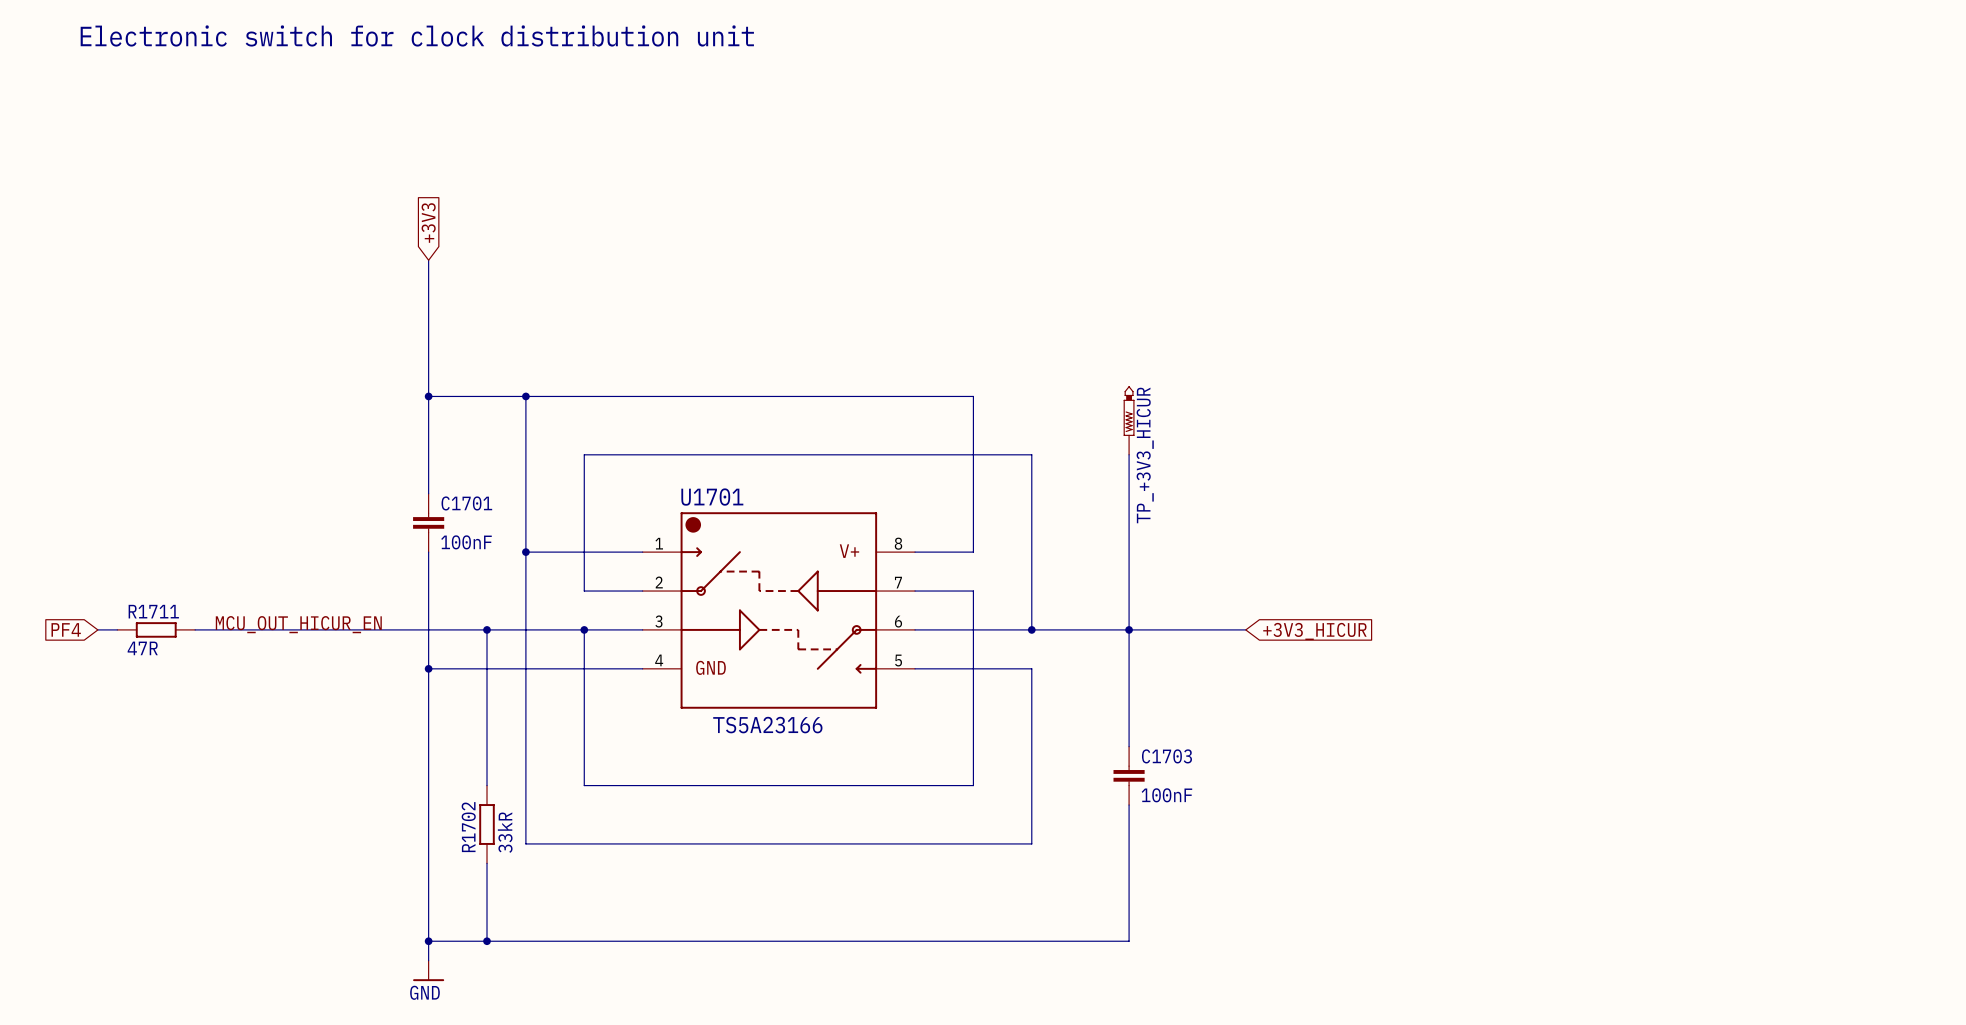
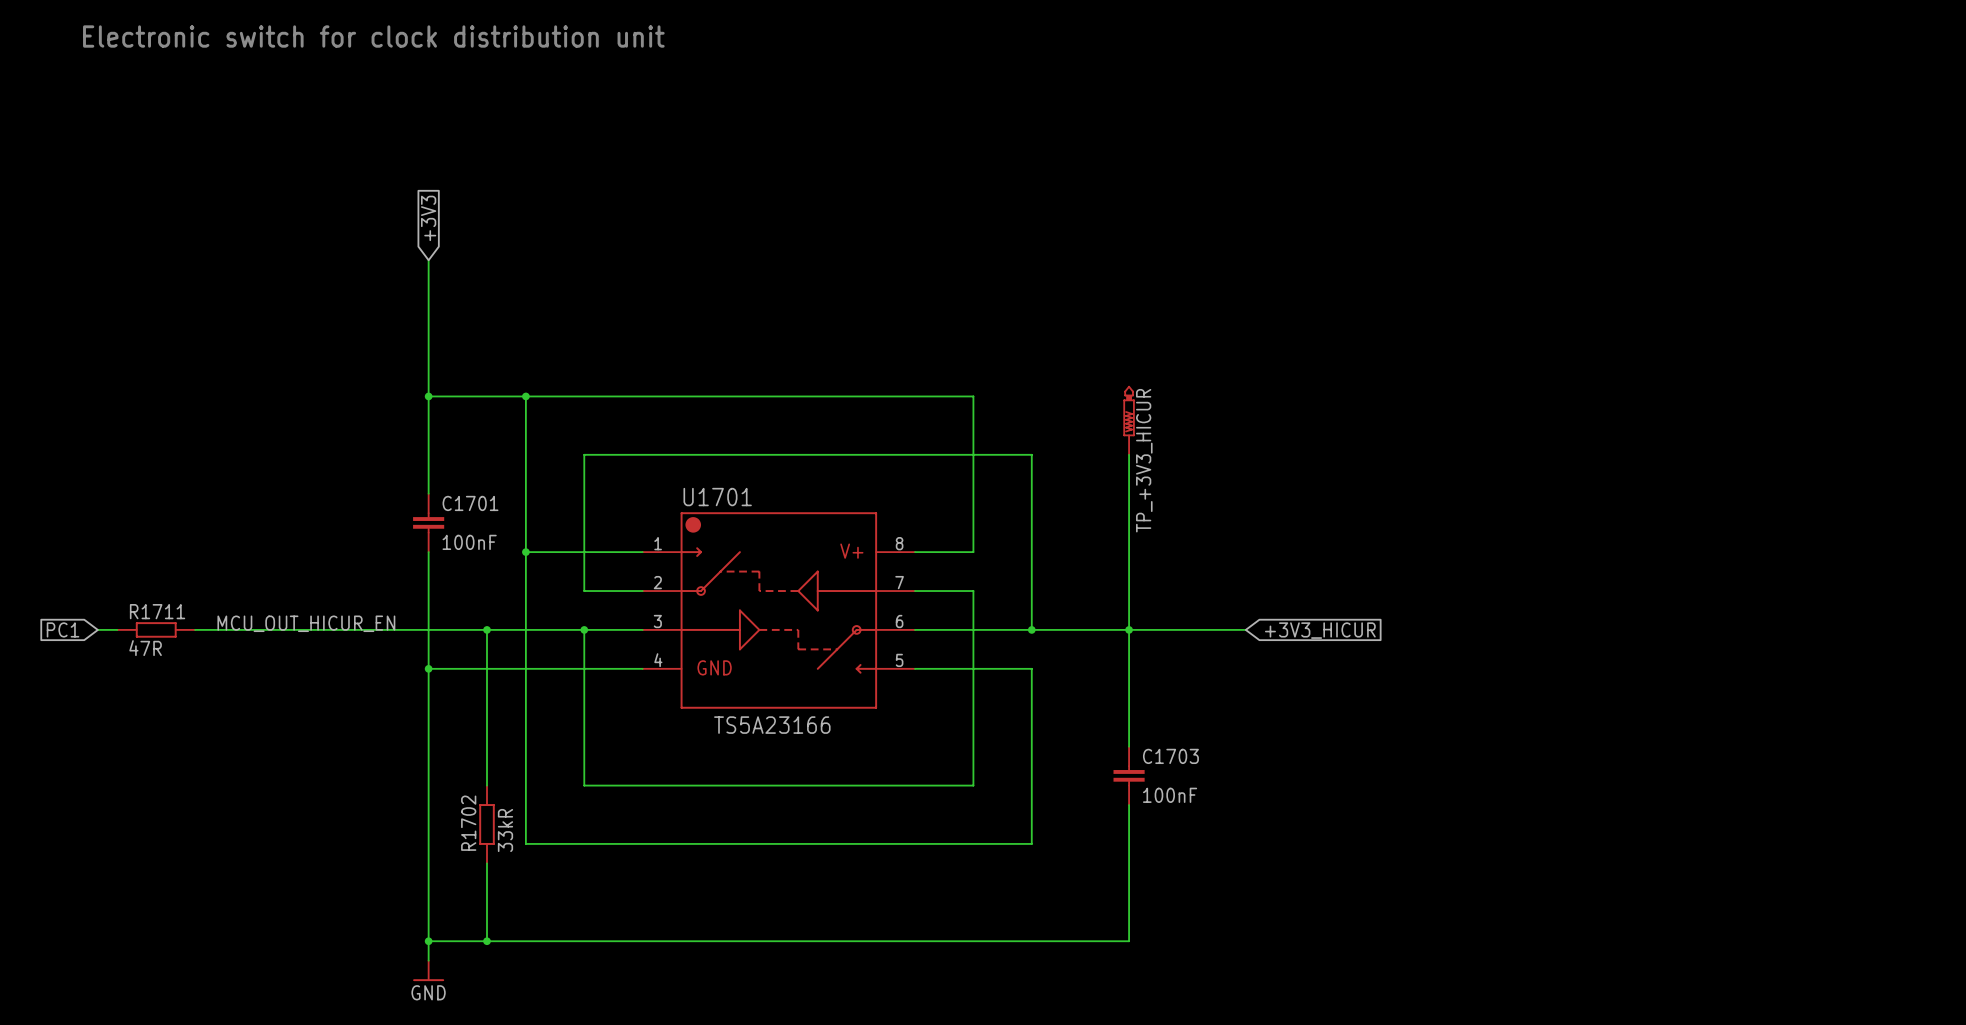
global label: PF4 (66, 629) -> PC1 (63, 629)

